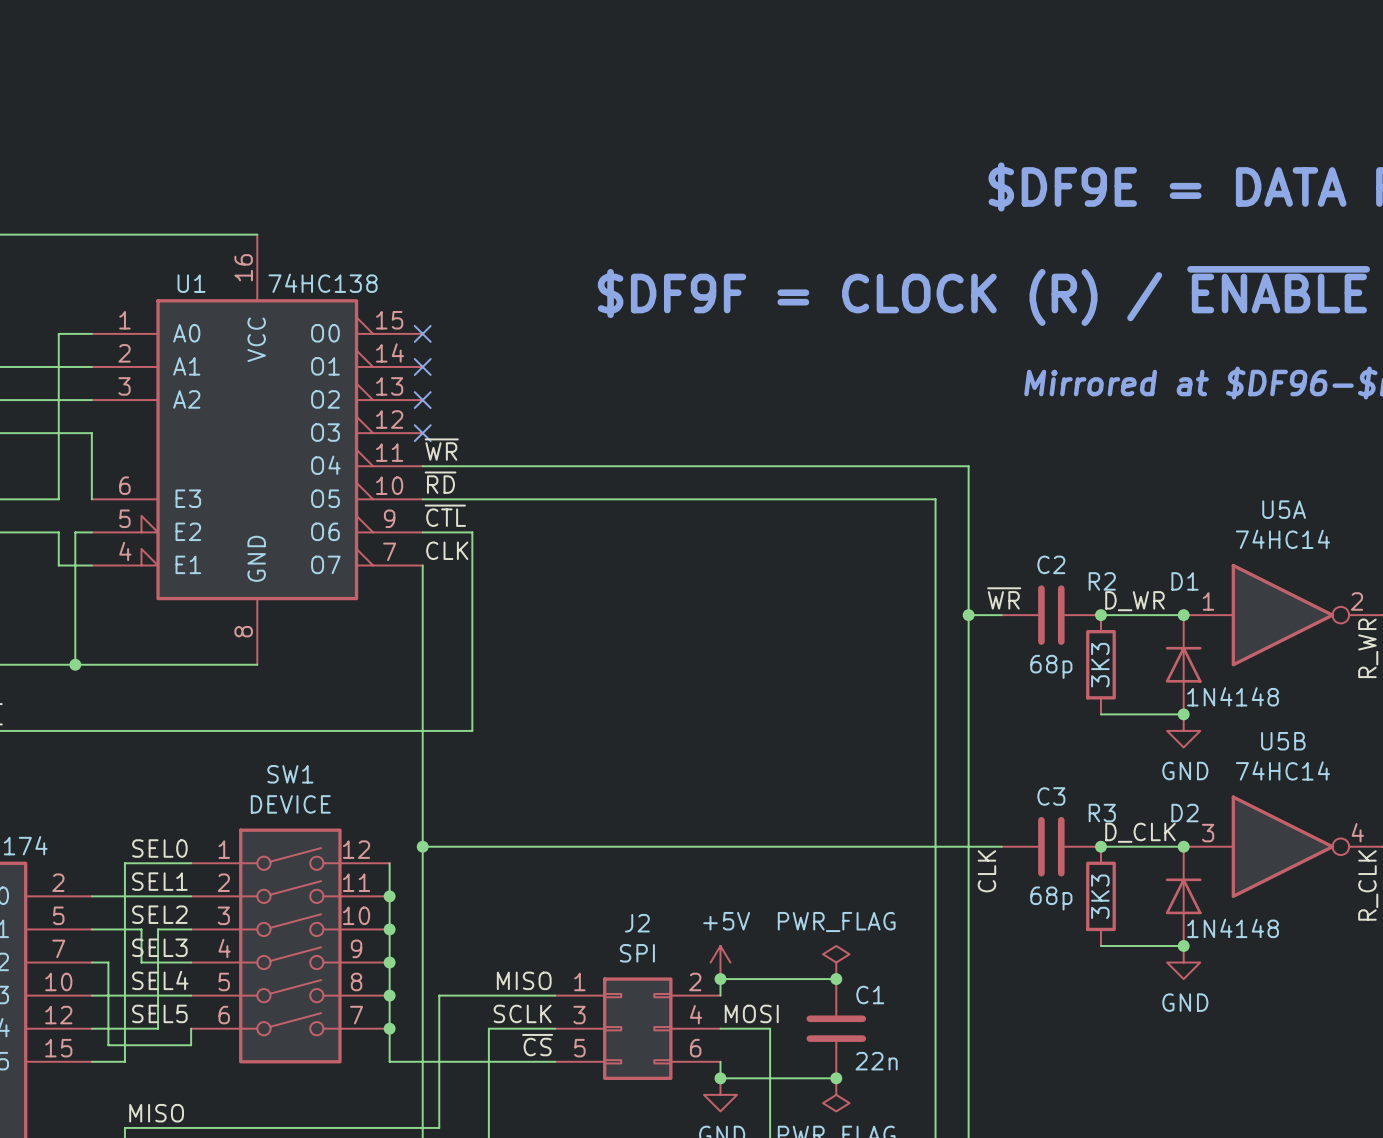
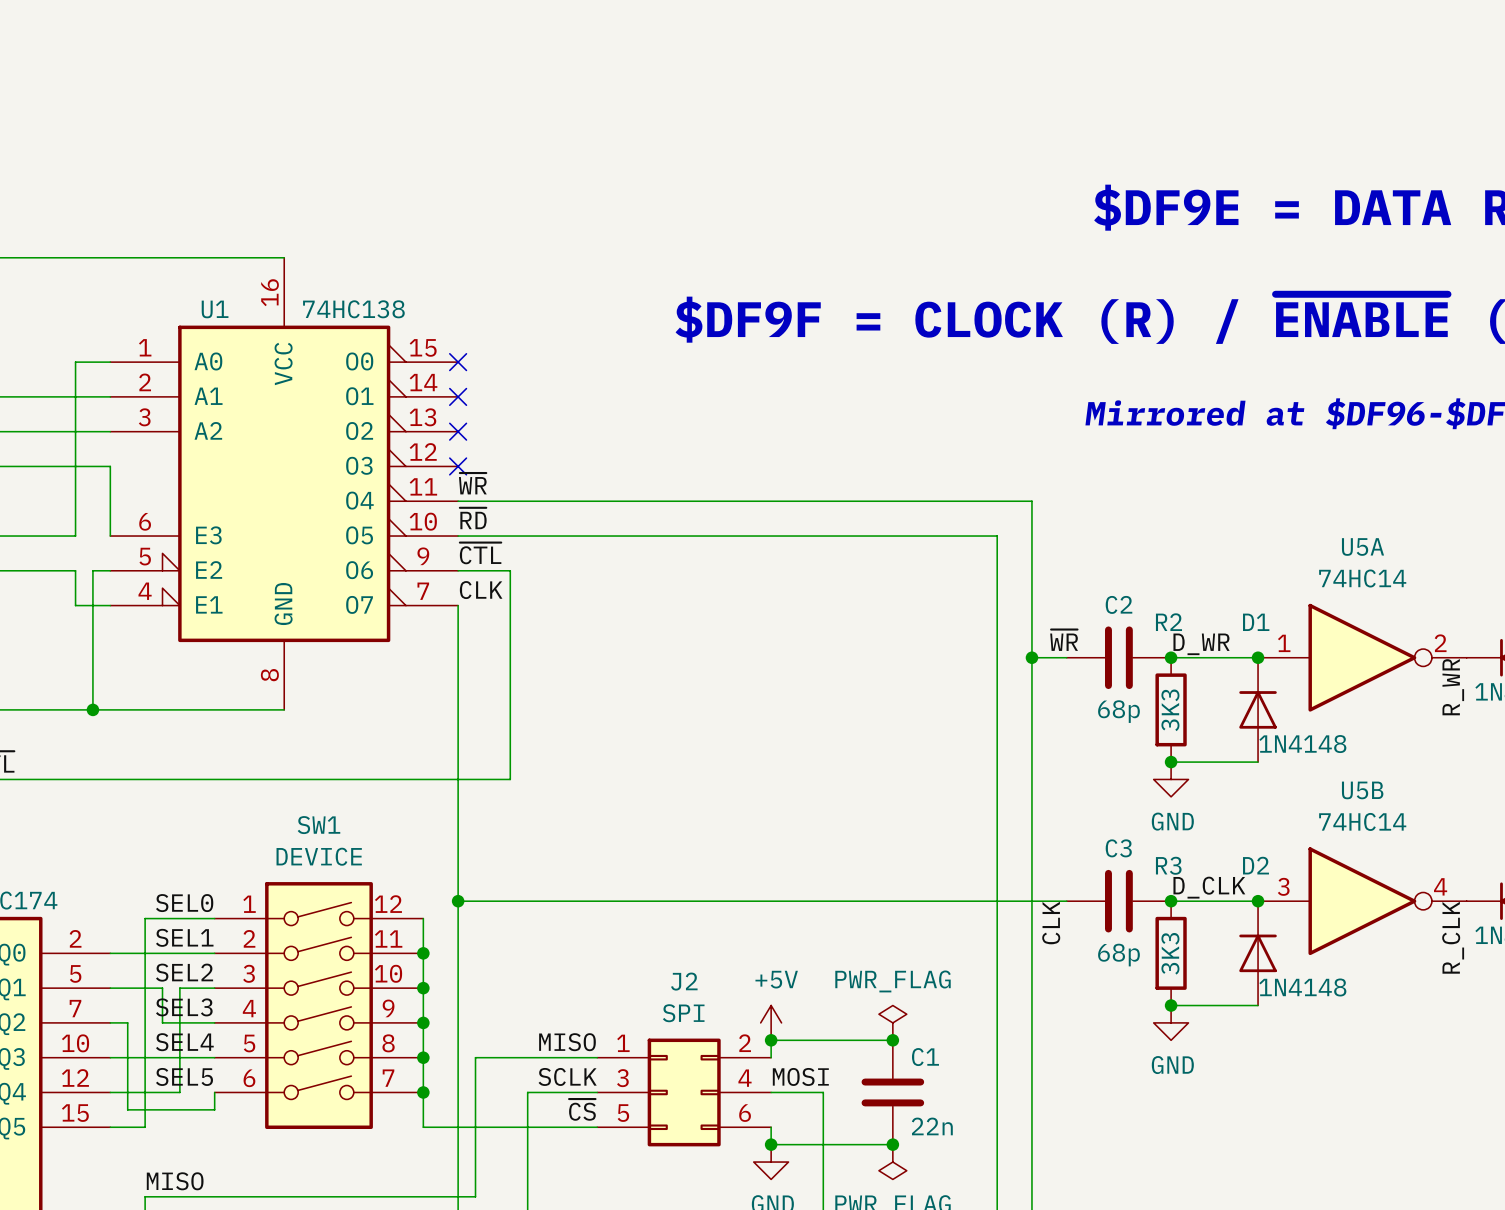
junction: none -> (1171, 762)
junction: (1183, 714) -> none
power symbol position: GND (1183, 730) -> GND (1171, 779)
junction: none -> (1171, 1005)
junction: (1183, 945) -> none
power symbol position: GND (1183, 962) -> GND (1171, 1022)

